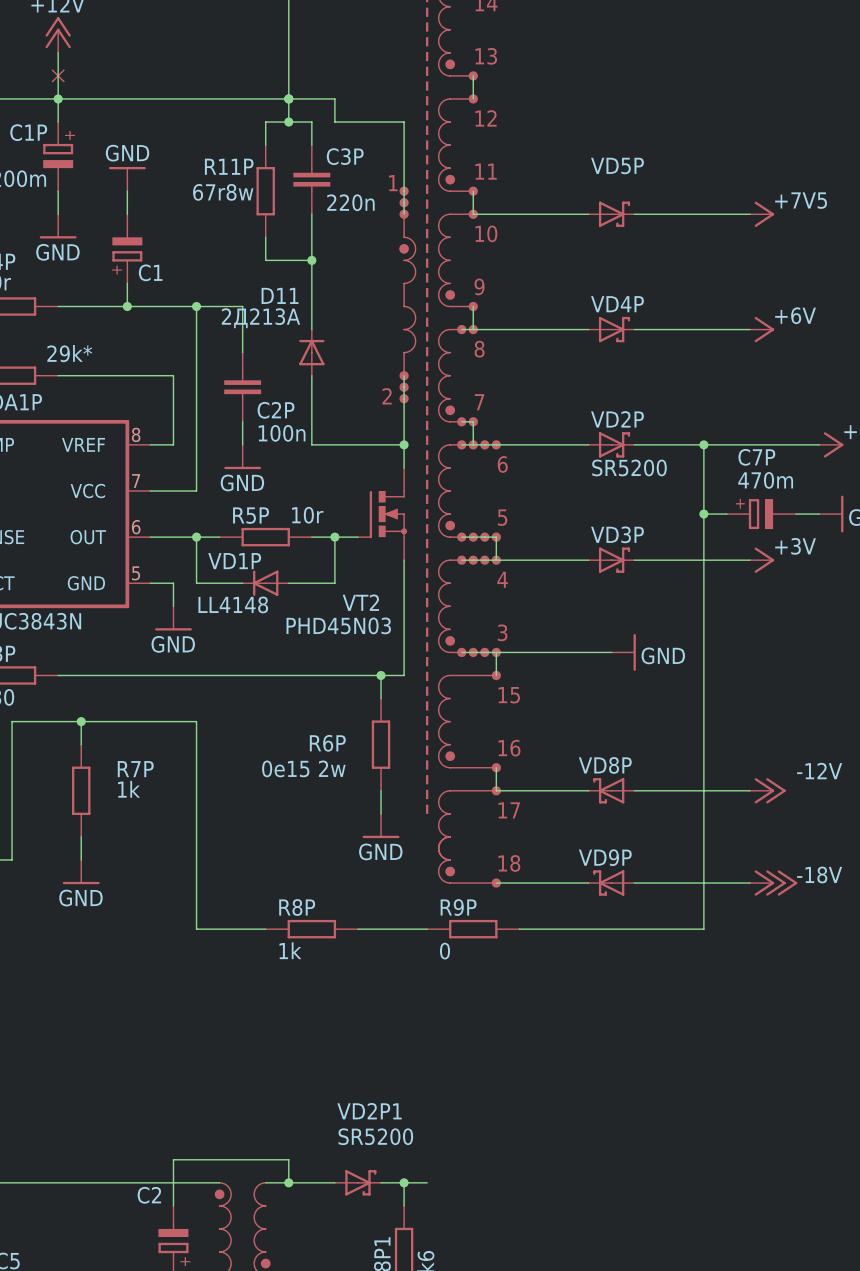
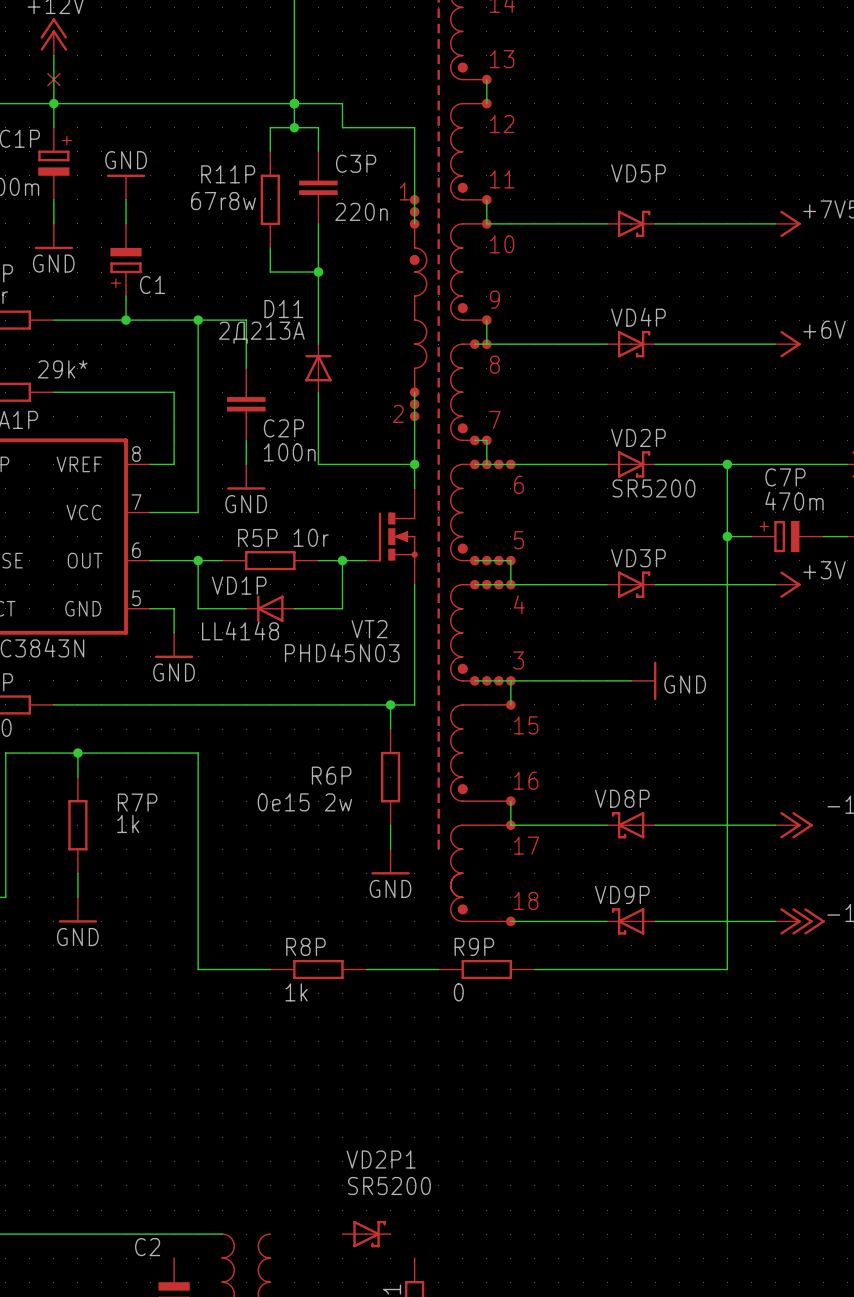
wire: (265, 1182) (334, 1182) -> none
wire: (288, 1182) (288, 1159) (173, 1159) (173, 1205) -> none
junction: (288, 1182) -> none
wire: (381, 1182) (427, 1182) -> none
wire: (404, 1182) (404, 1205) -> none
junction: (404, 1182) -> none
drawing: [214, 1189, 225, 1200] -> none

